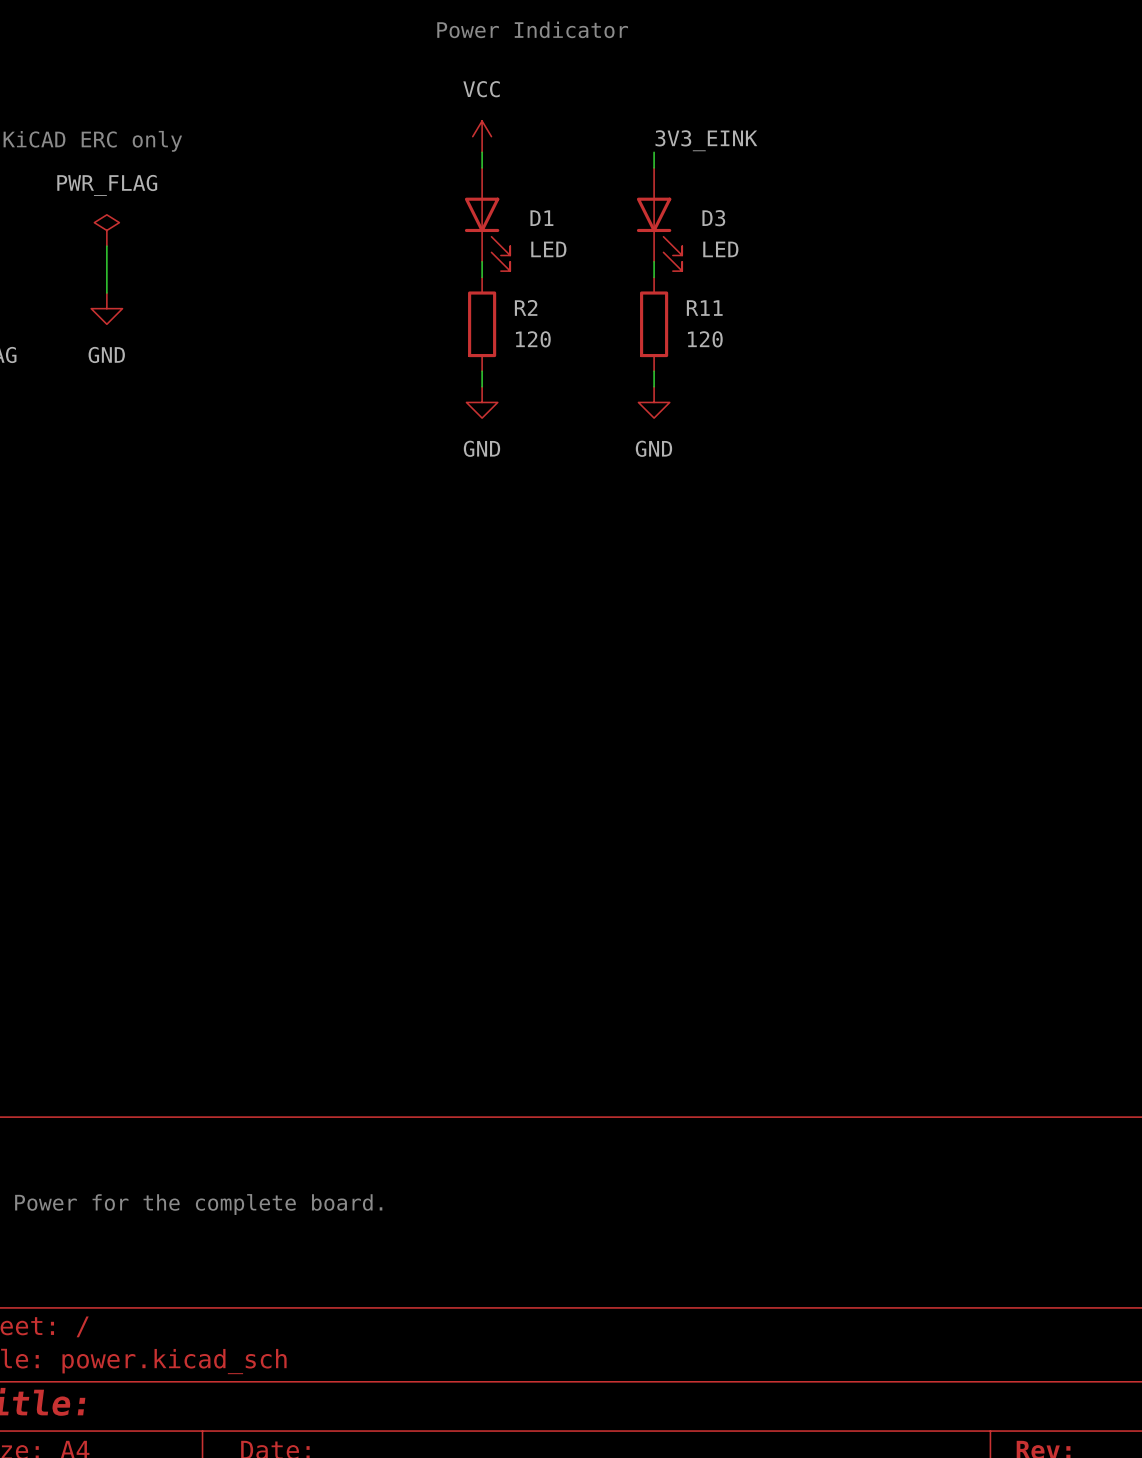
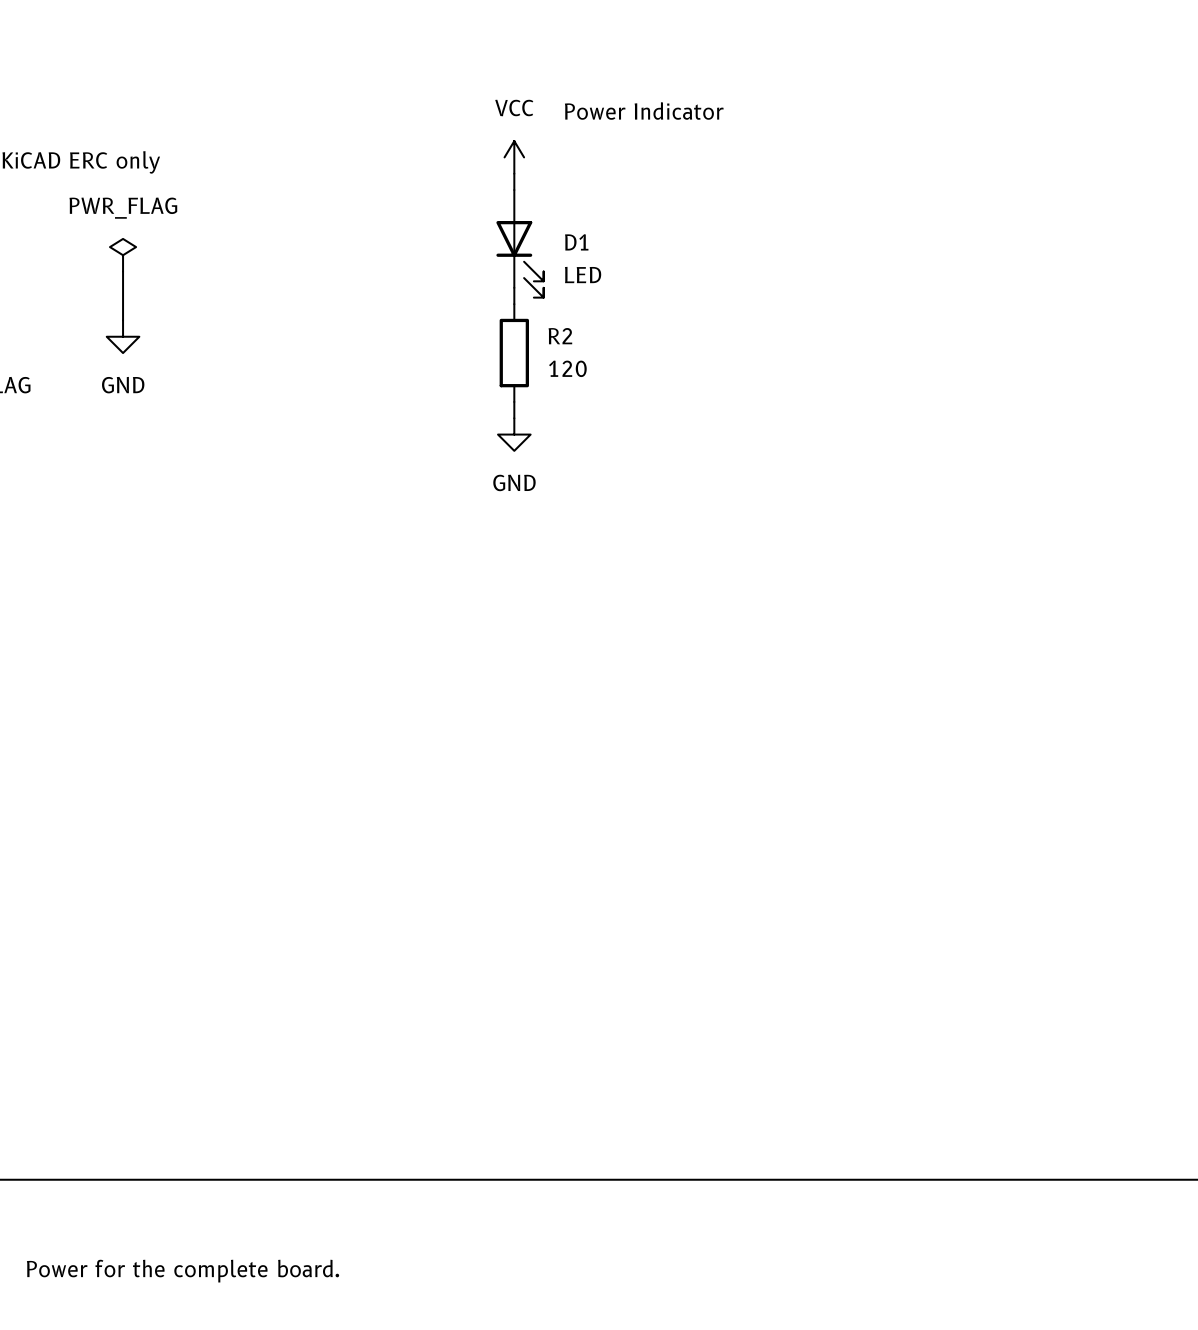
text position: Power Indicator (532, 29) -> Power Indicator (644, 111)
label: 3V3_EINK (706, 140) -> none
wire: (654, 152) (654, 167) -> none
D3: LED (659, 219) -> none
wire: (654, 261) (654, 277) -> none
R11: 120 (654, 324) -> none
wire: (654, 371) (654, 386) -> none
power symbol: GND (654, 402) -> none

